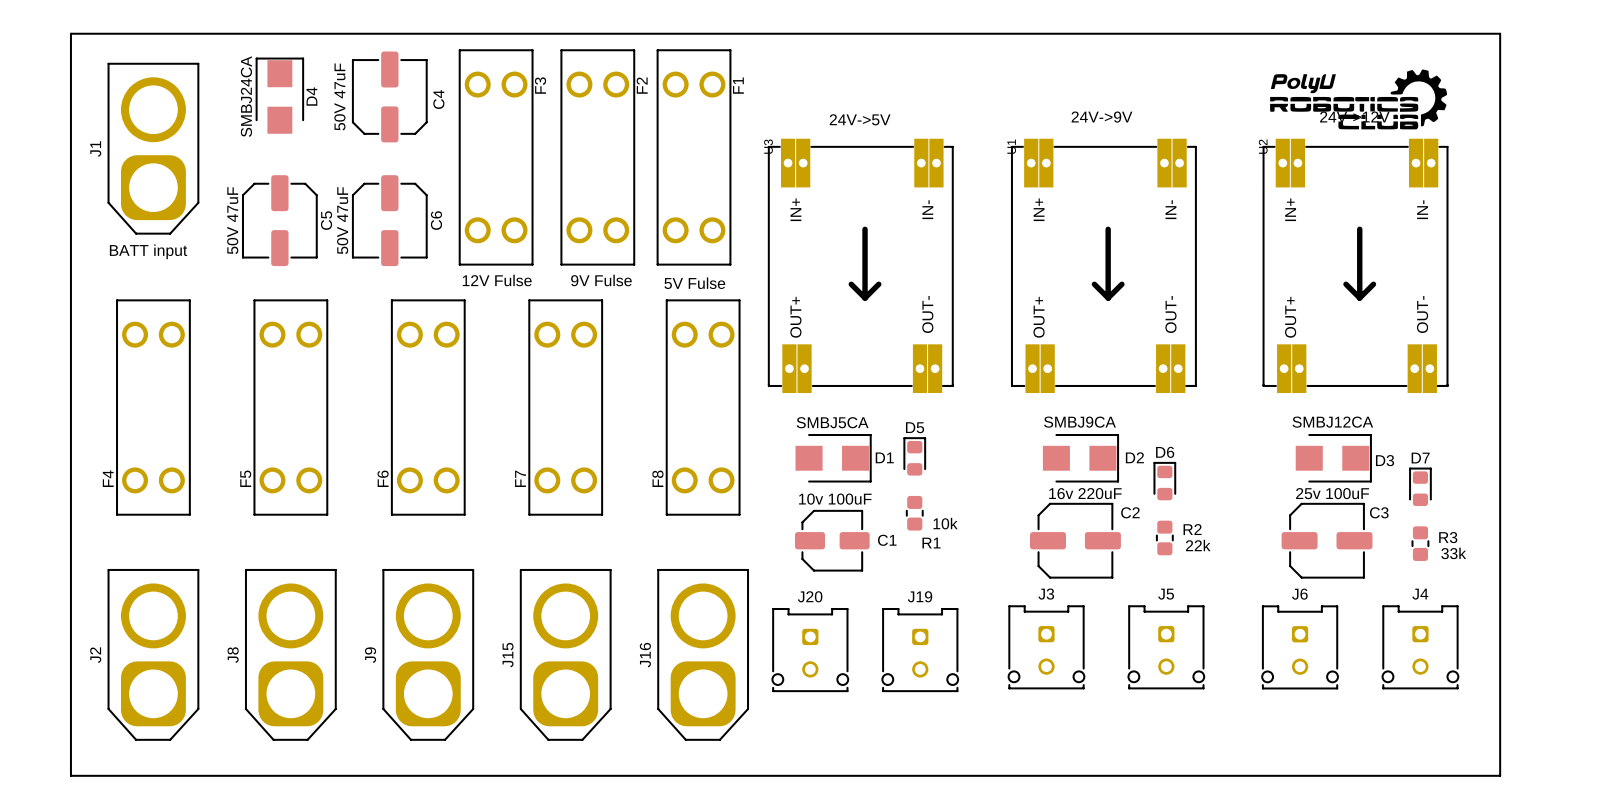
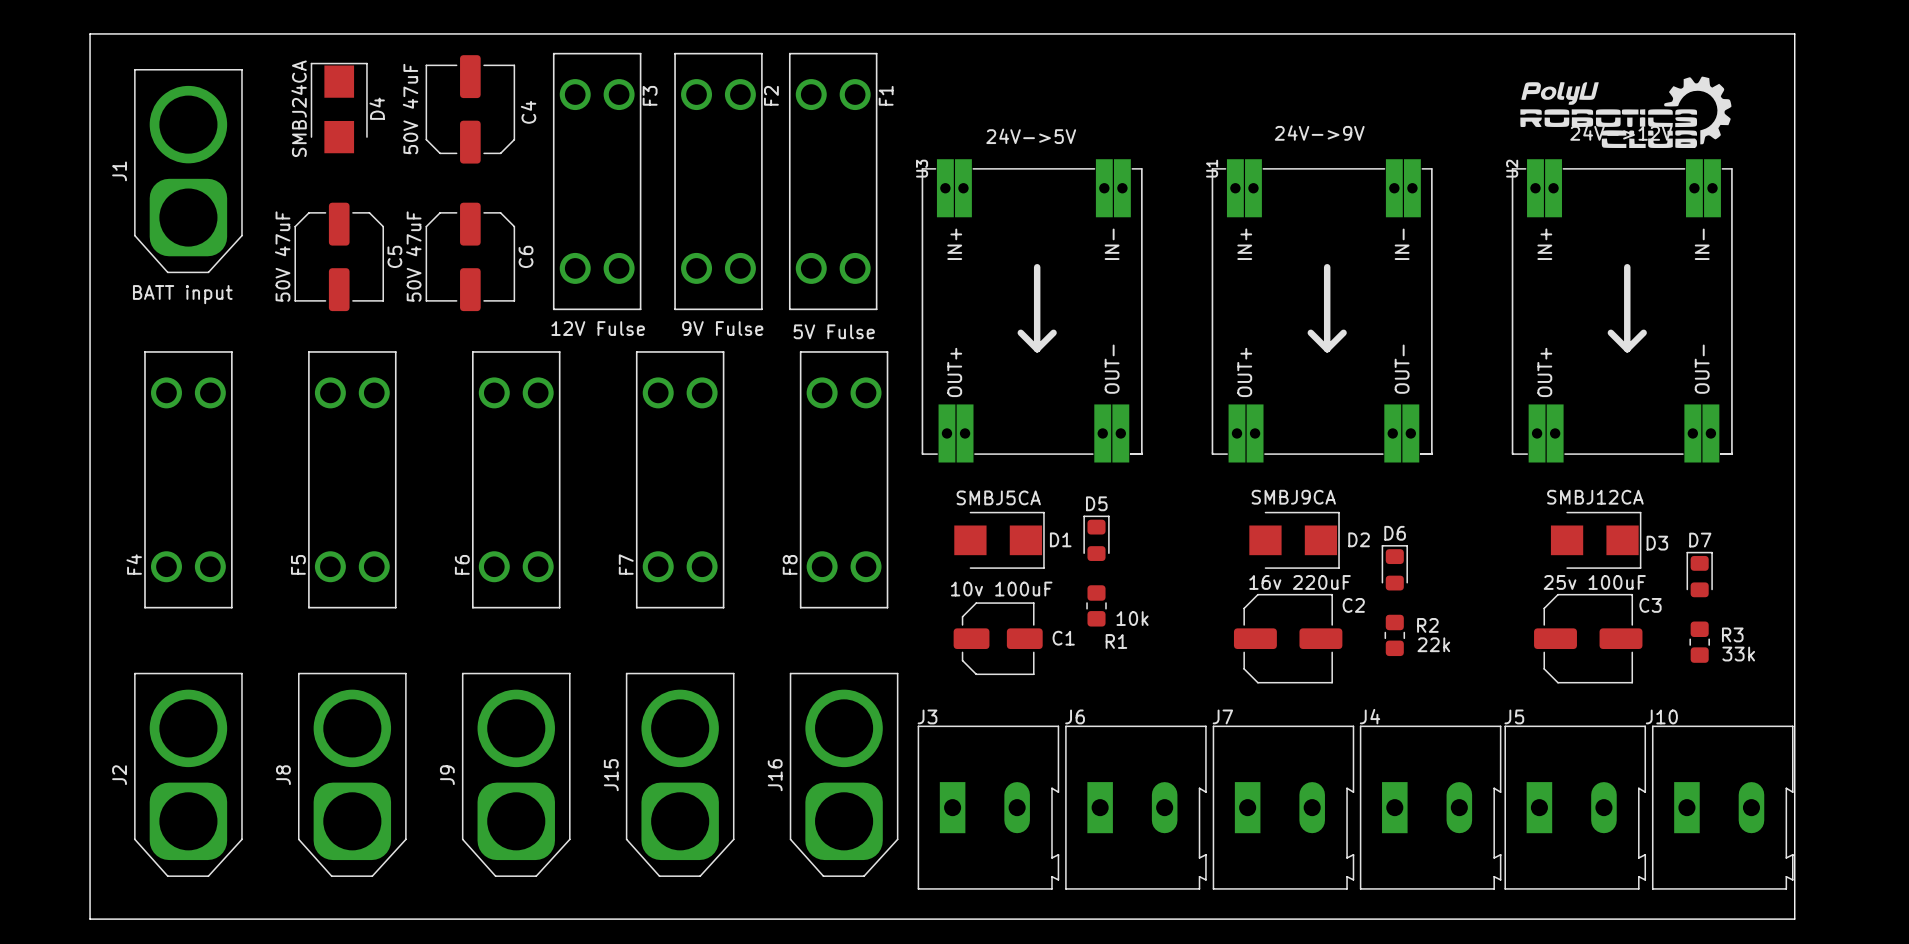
J3 name position: J3 (1046, 594) -> J3 (927, 716)
J5 name position: J5 (1166, 594) -> J5 (1514, 716)
J6 name position: J6 (1299, 594) -> J6 (1075, 716)
J4 name position: J4 (1420, 594) -> J4 (1370, 716)
J3 footprint: [1008, 605, 1085, 690] -> [917, 725, 1060, 890]
J5 footprint: [1128, 605, 1205, 690] -> [1504, 725, 1647, 890]
J6 footprint: [1262, 605, 1338, 690] -> [1065, 725, 1207, 890]
J4 footprint: [1382, 605, 1459, 690] -> [1359, 725, 1502, 890]
J20: (810, 650) -> none
J19: (920, 650) -> none
J7: none -> (1283, 807)
J10: none -> (1722, 807)

